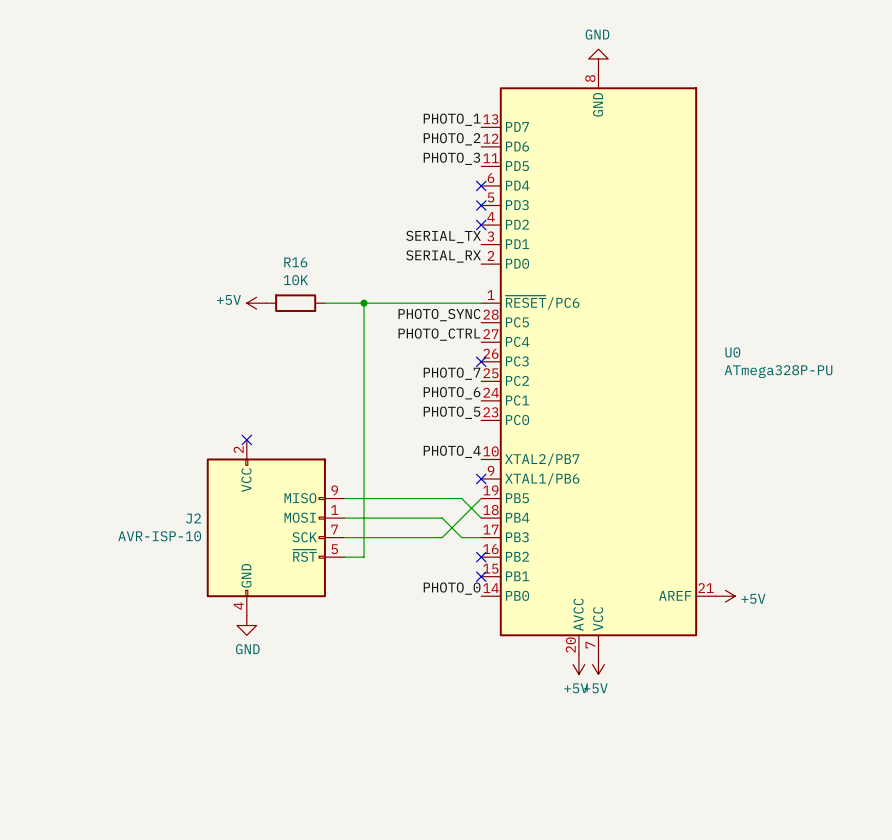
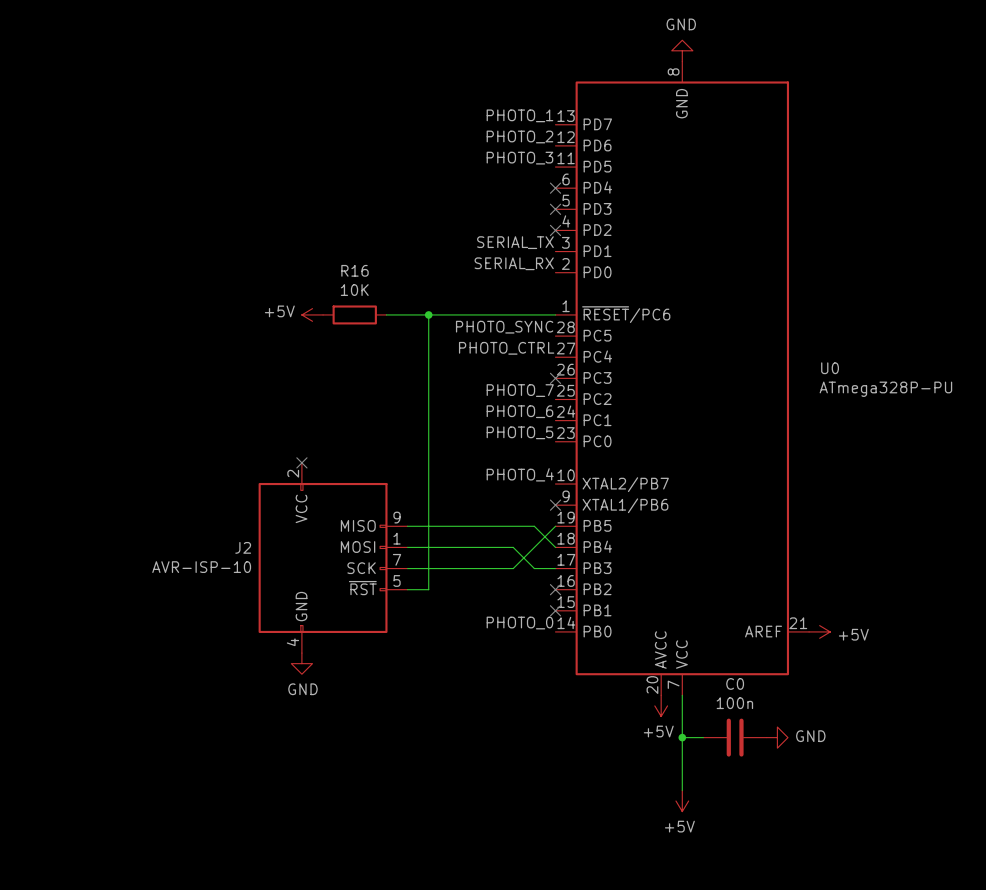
wire: none -> (682, 695) (682, 790)
power symbol position: +5V (598, 664) -> +5V (682, 801)
wire: none -> (682, 737) (703, 737)
junction: none -> (682, 737)
C0: none -> 100n (735, 737)
power symbol: none -> GND (777, 737)

